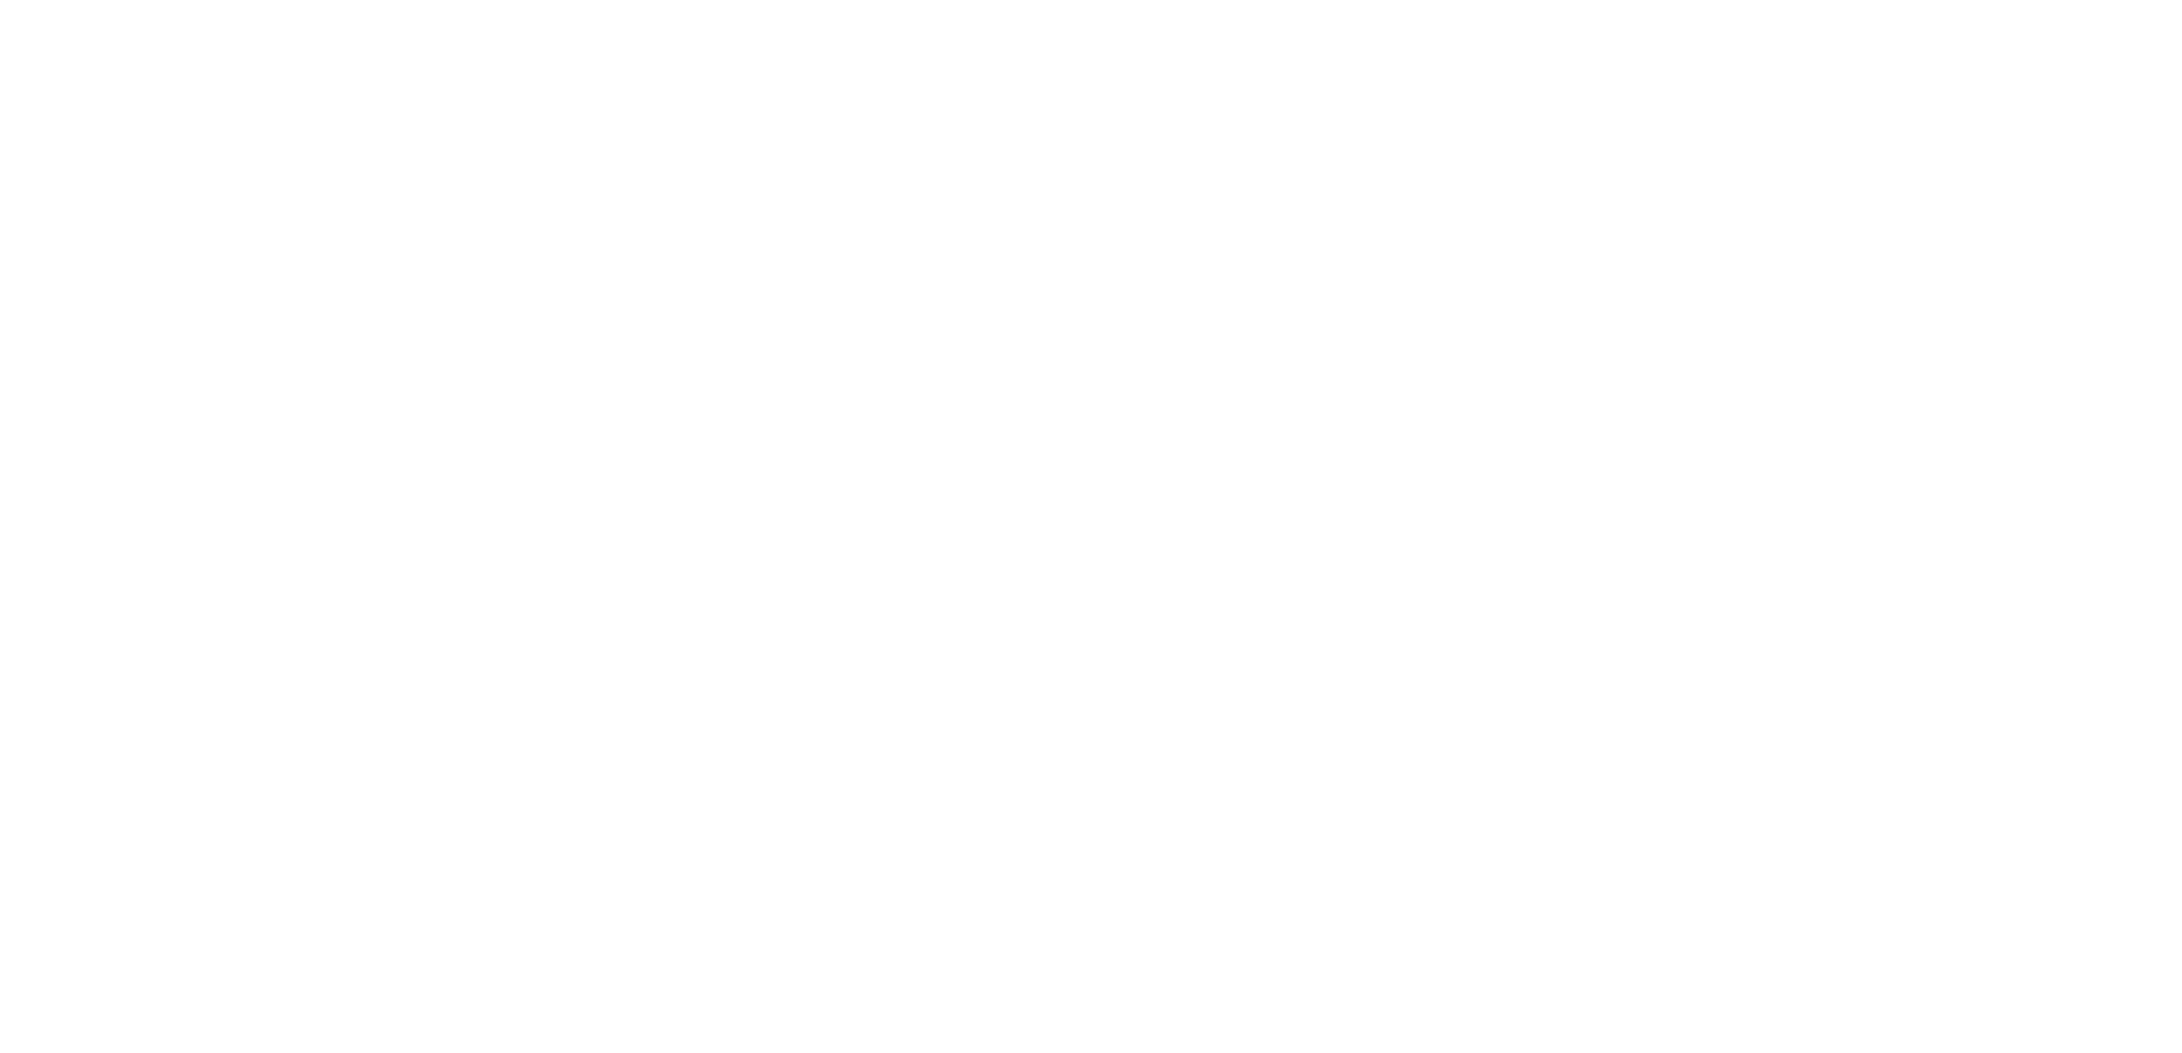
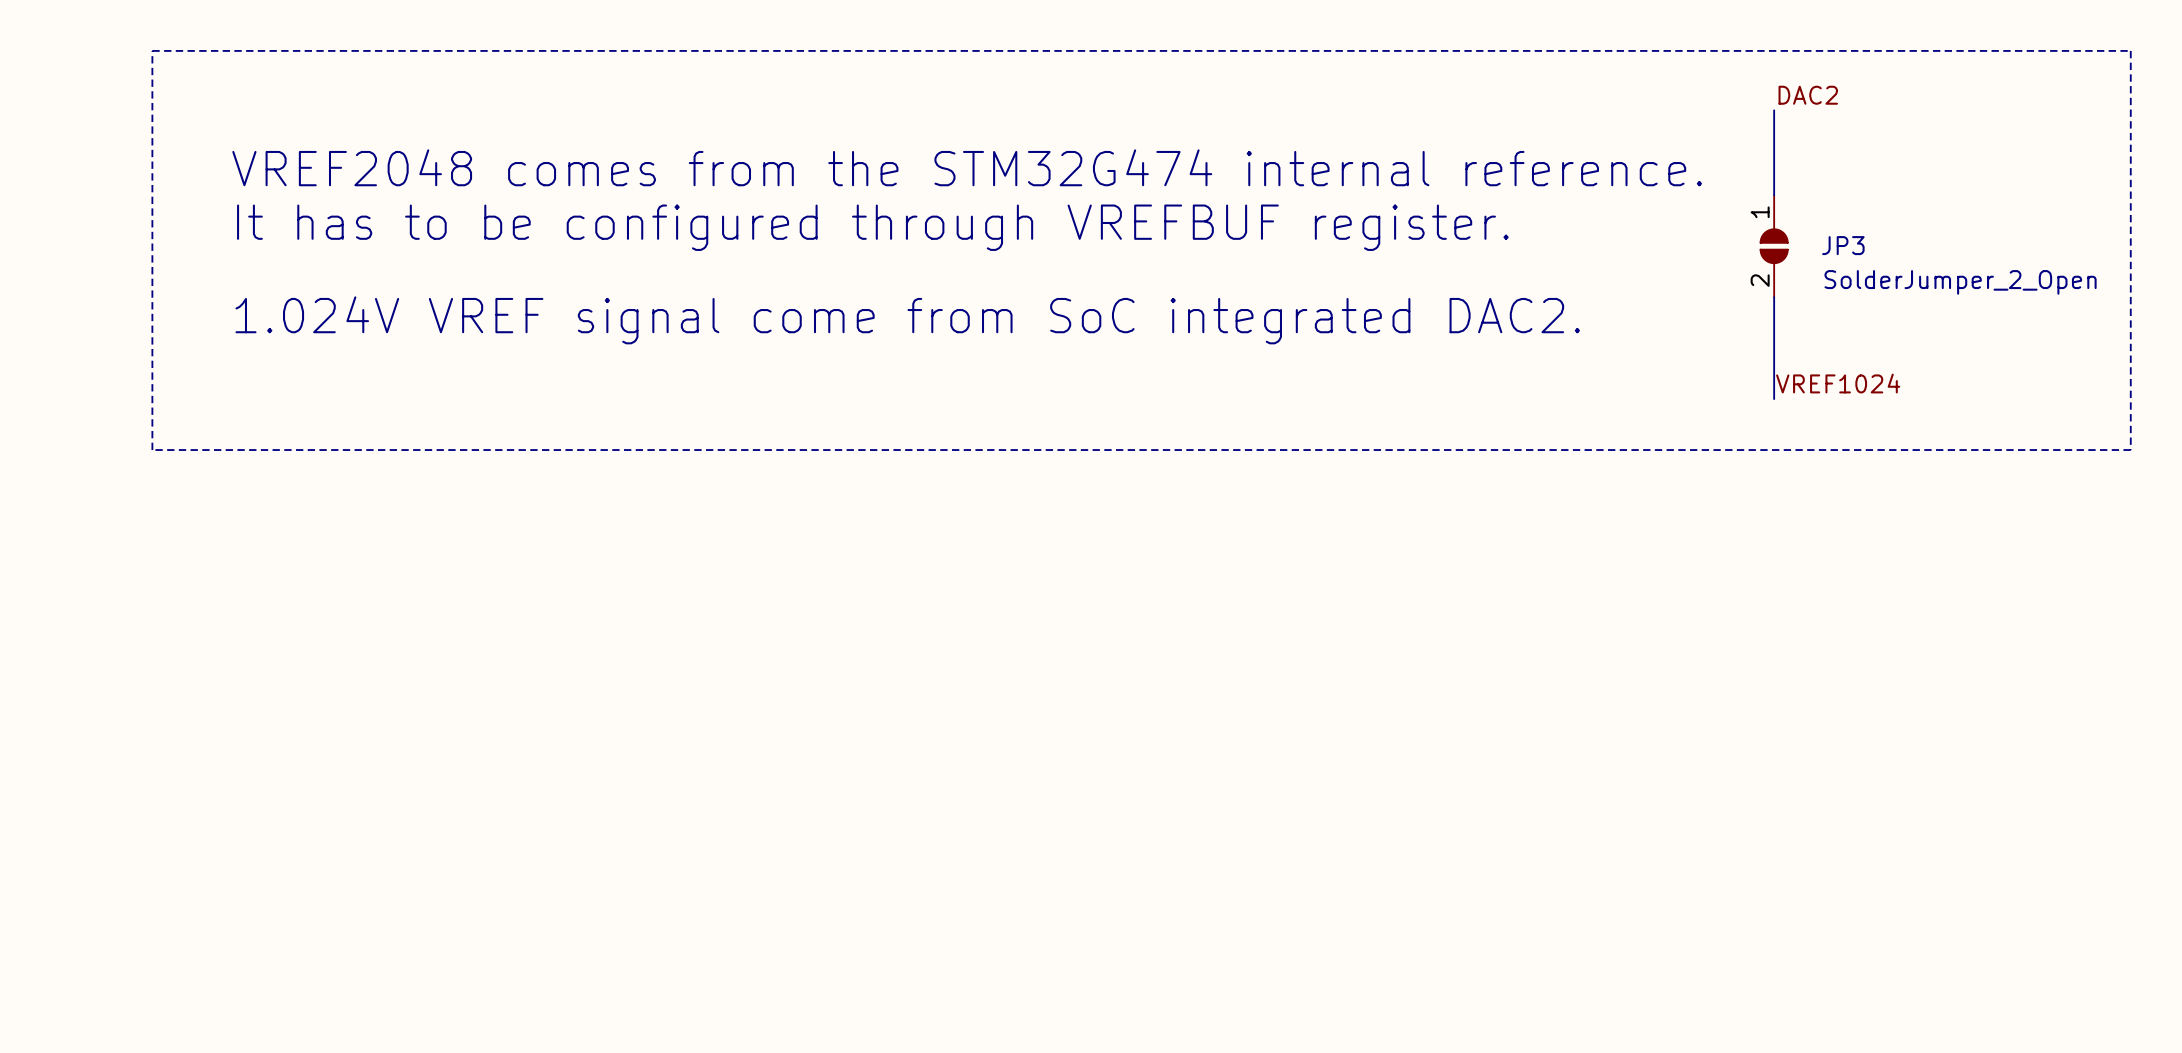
line: none -> (152, 50) (152, 450) (2130, 450) (2130, 50) (152, 50)
label: none -> DAC2 (1808, 95)
wire: none -> (1774, 110) (1774, 195)
text: none -> VREF2048 comes from the STM32G474 internal reference. (967, 167)
text: none -> It has to be configured through VREFBUF register. (872, 227)
JP3: none -> SolderJumper_2_Open (1774, 246)
wire: none -> (1774, 297) (1774, 399)
text: none -> 1.024V VREF signal come from SoC integrated DAC2. (907, 320)
label: none -> VREF1024 (1838, 383)

